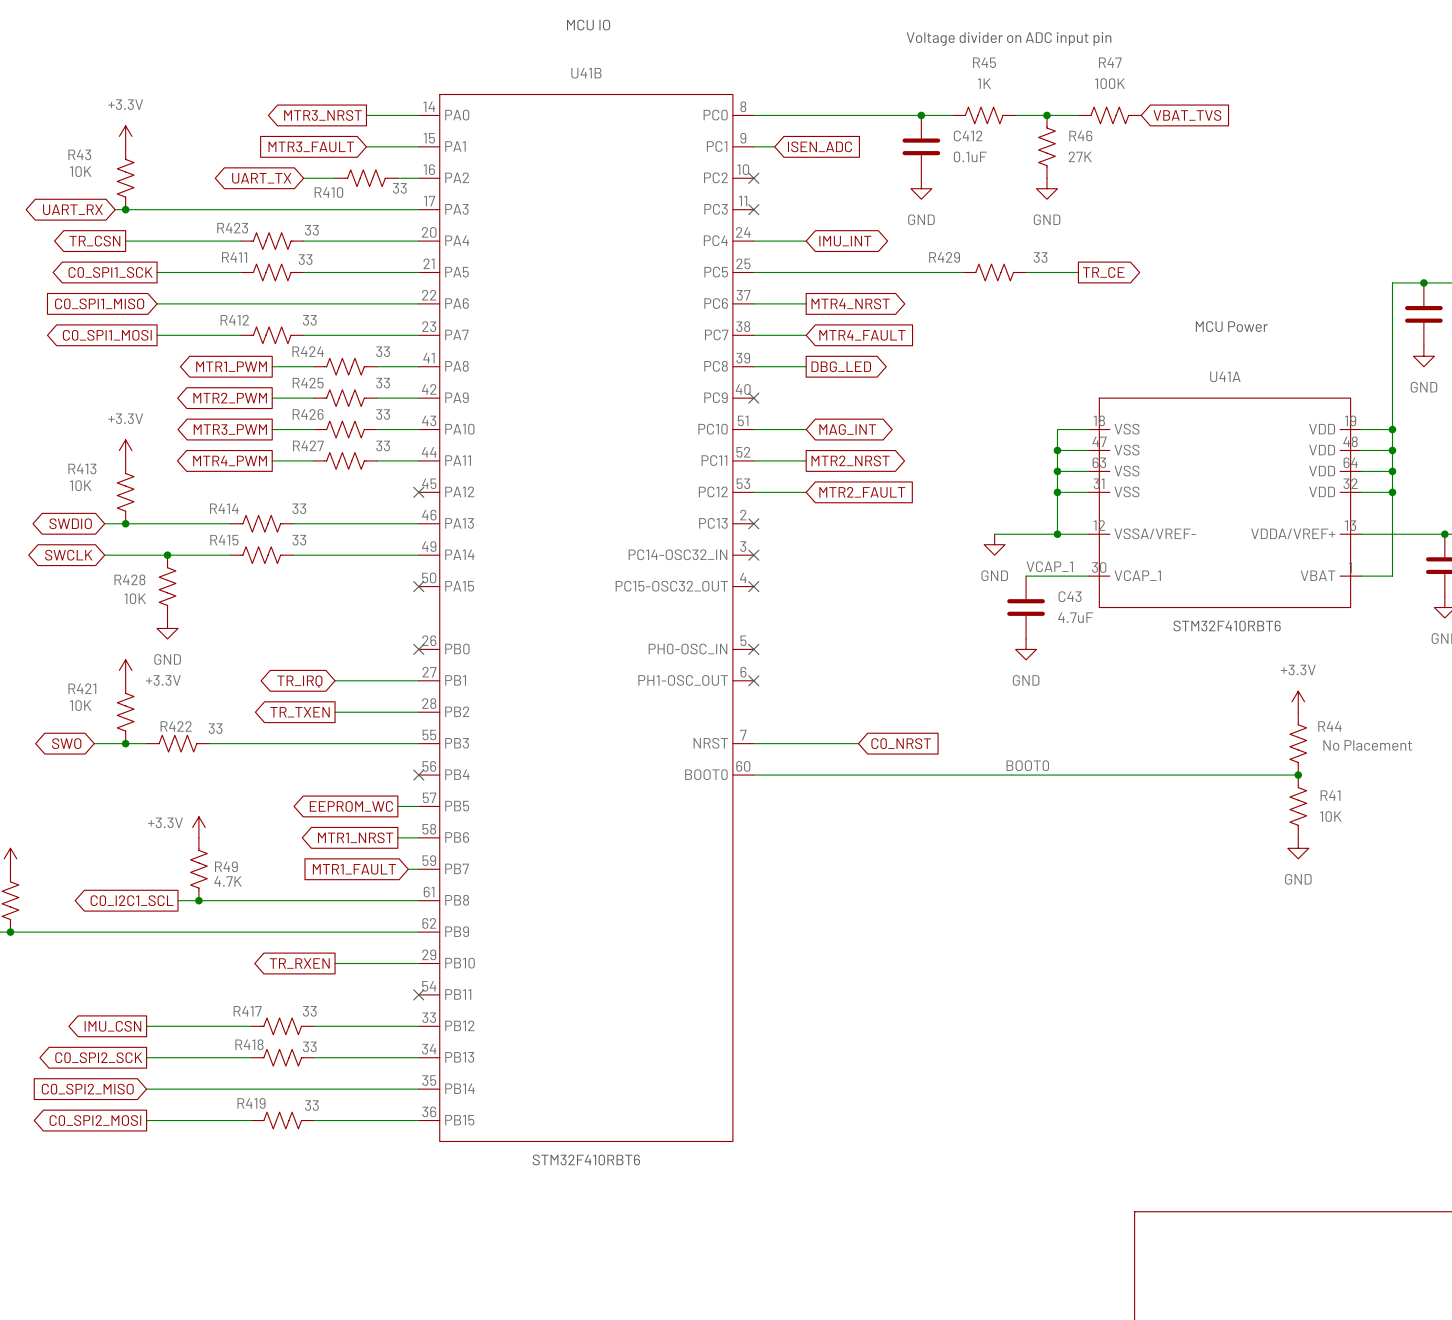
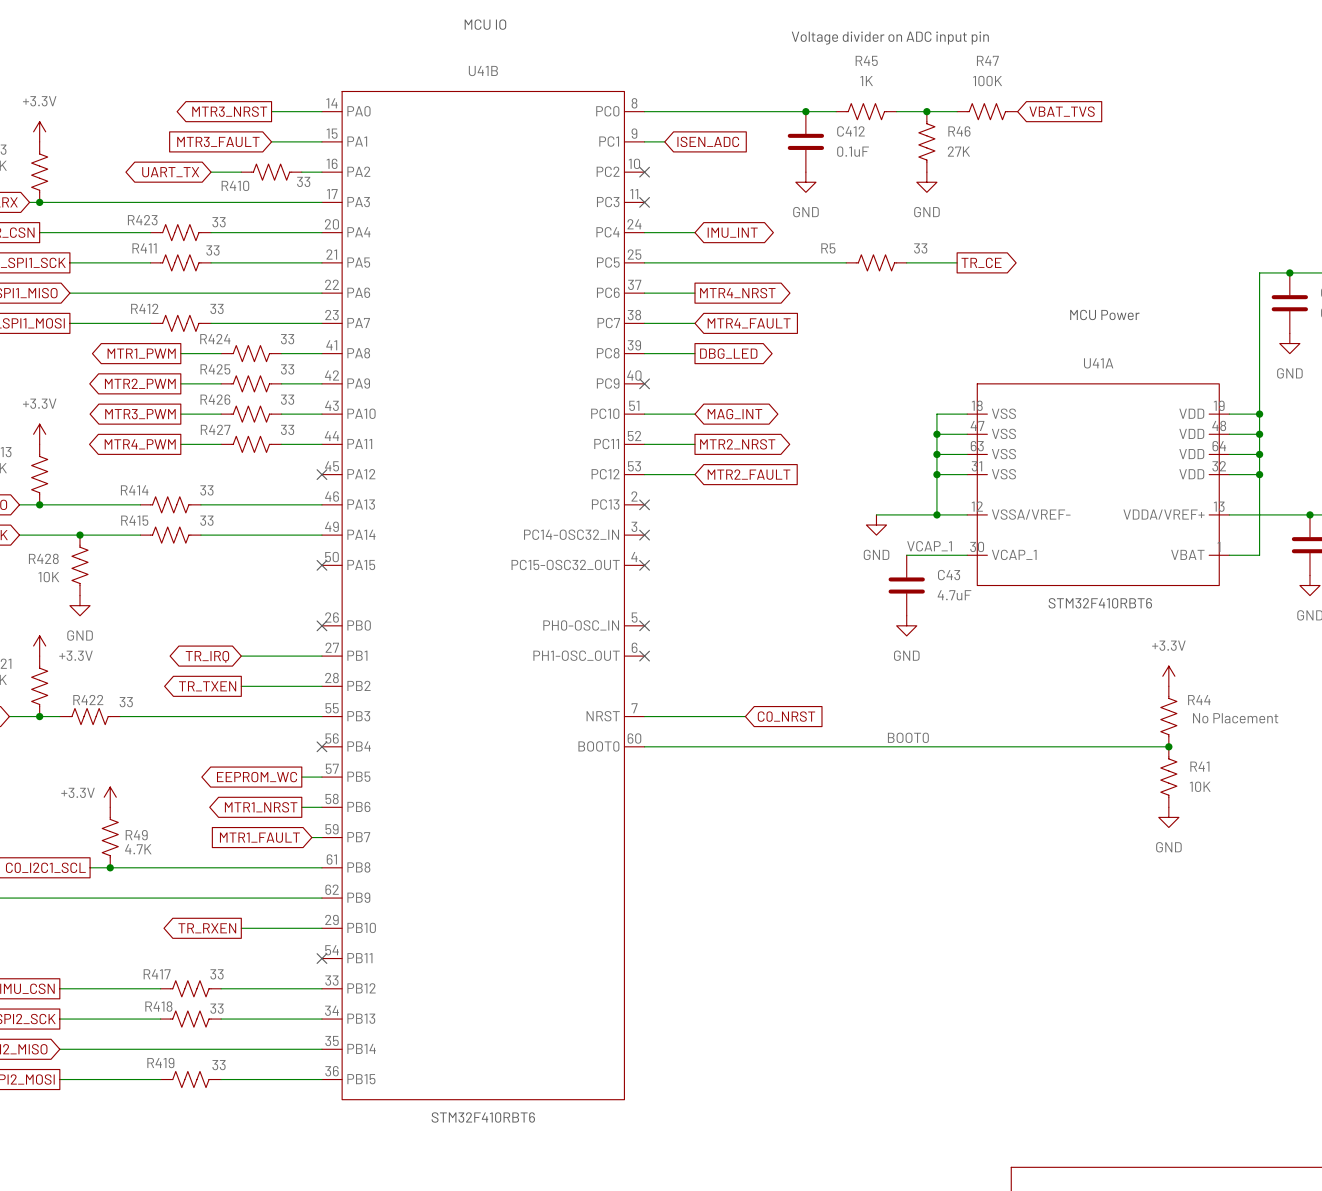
R429 name: R429 (944, 257) -> R5 (828, 248)

